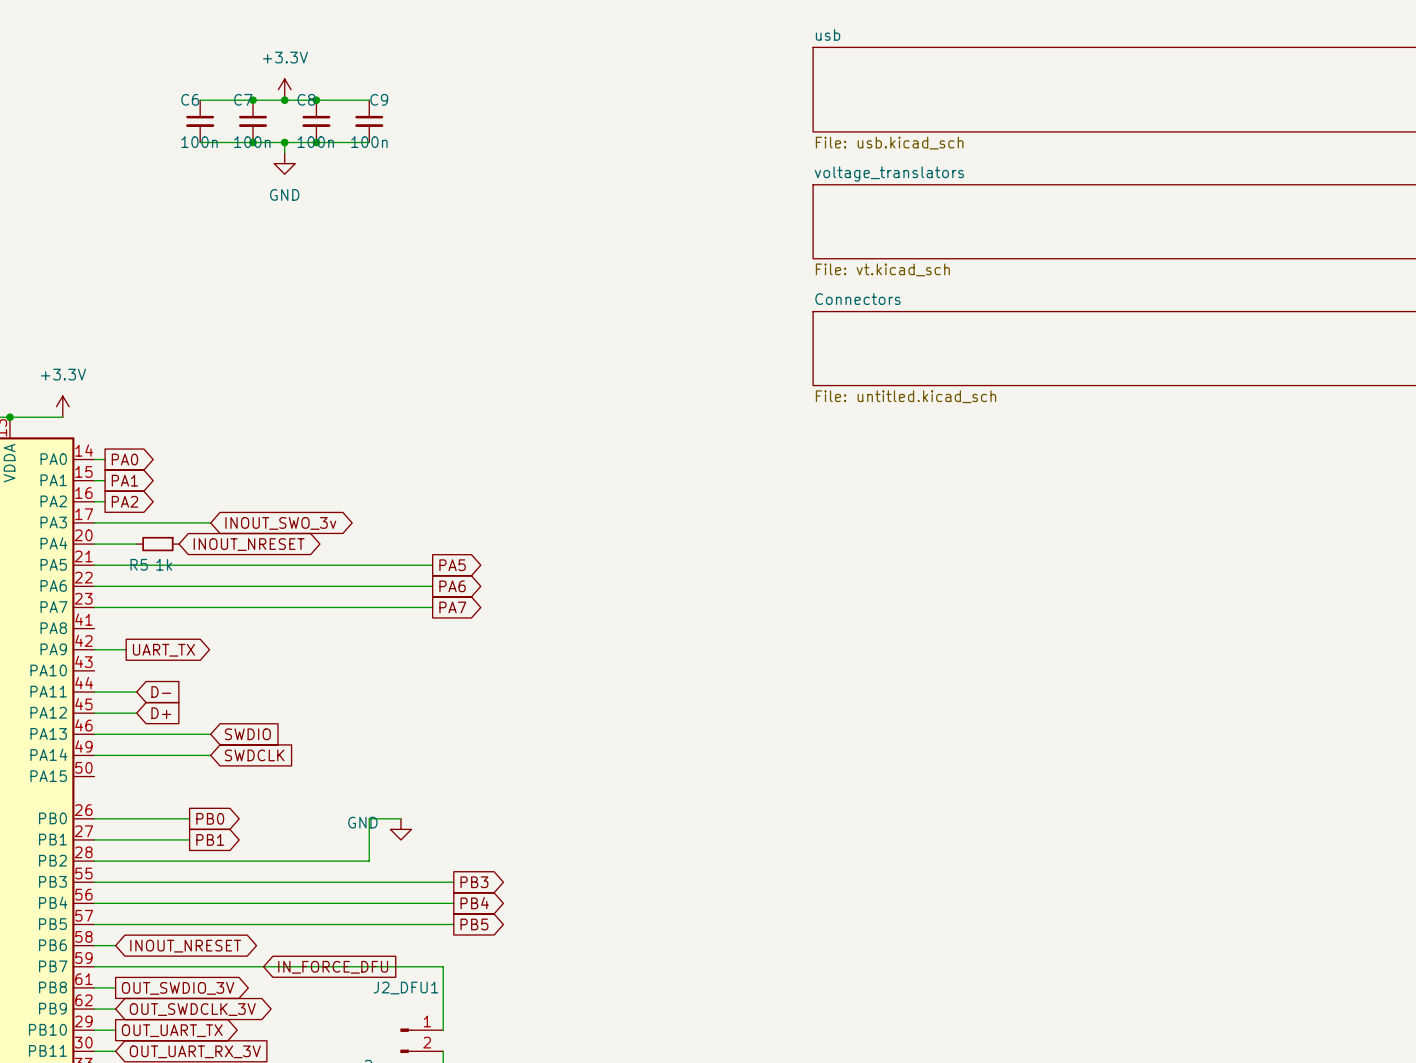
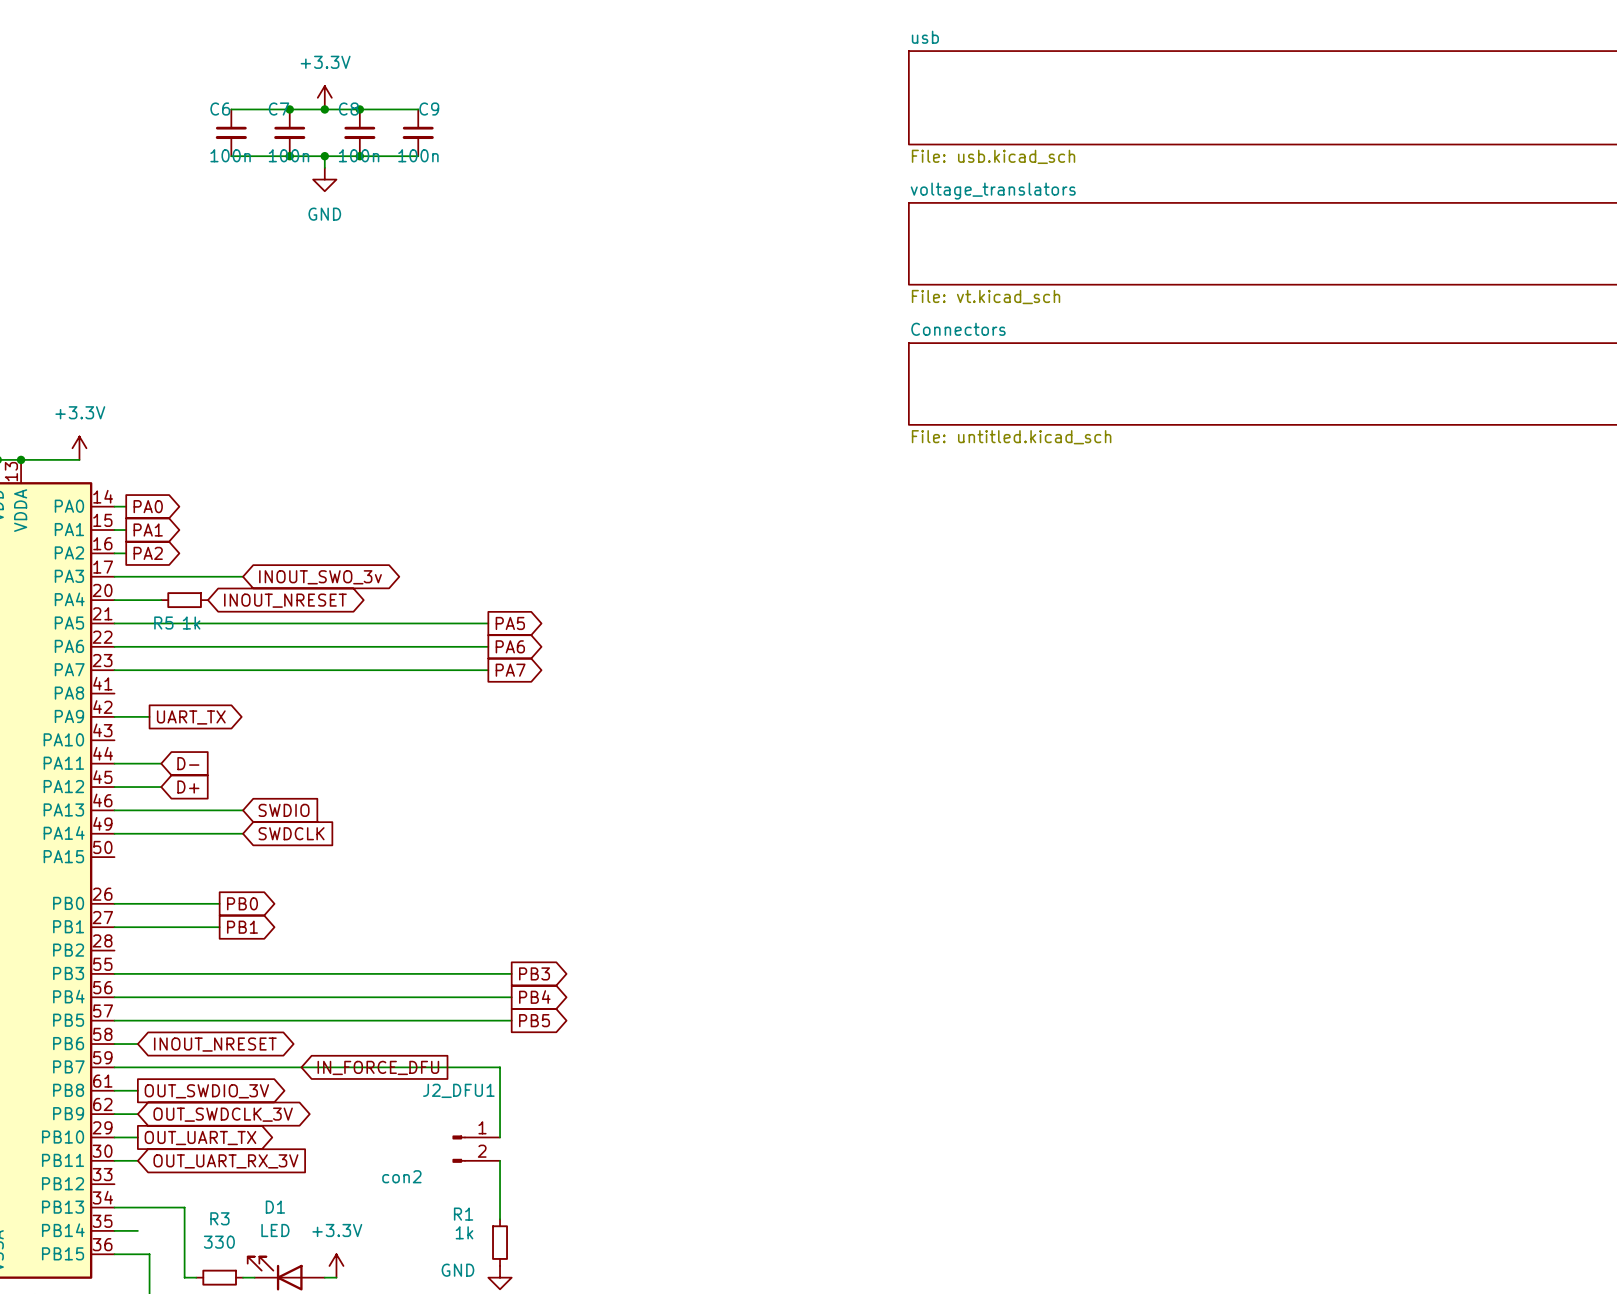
wire: (400, 818) (369, 818) (369, 861) (94, 861) -> none
power symbol: GND (400, 829) -> none

